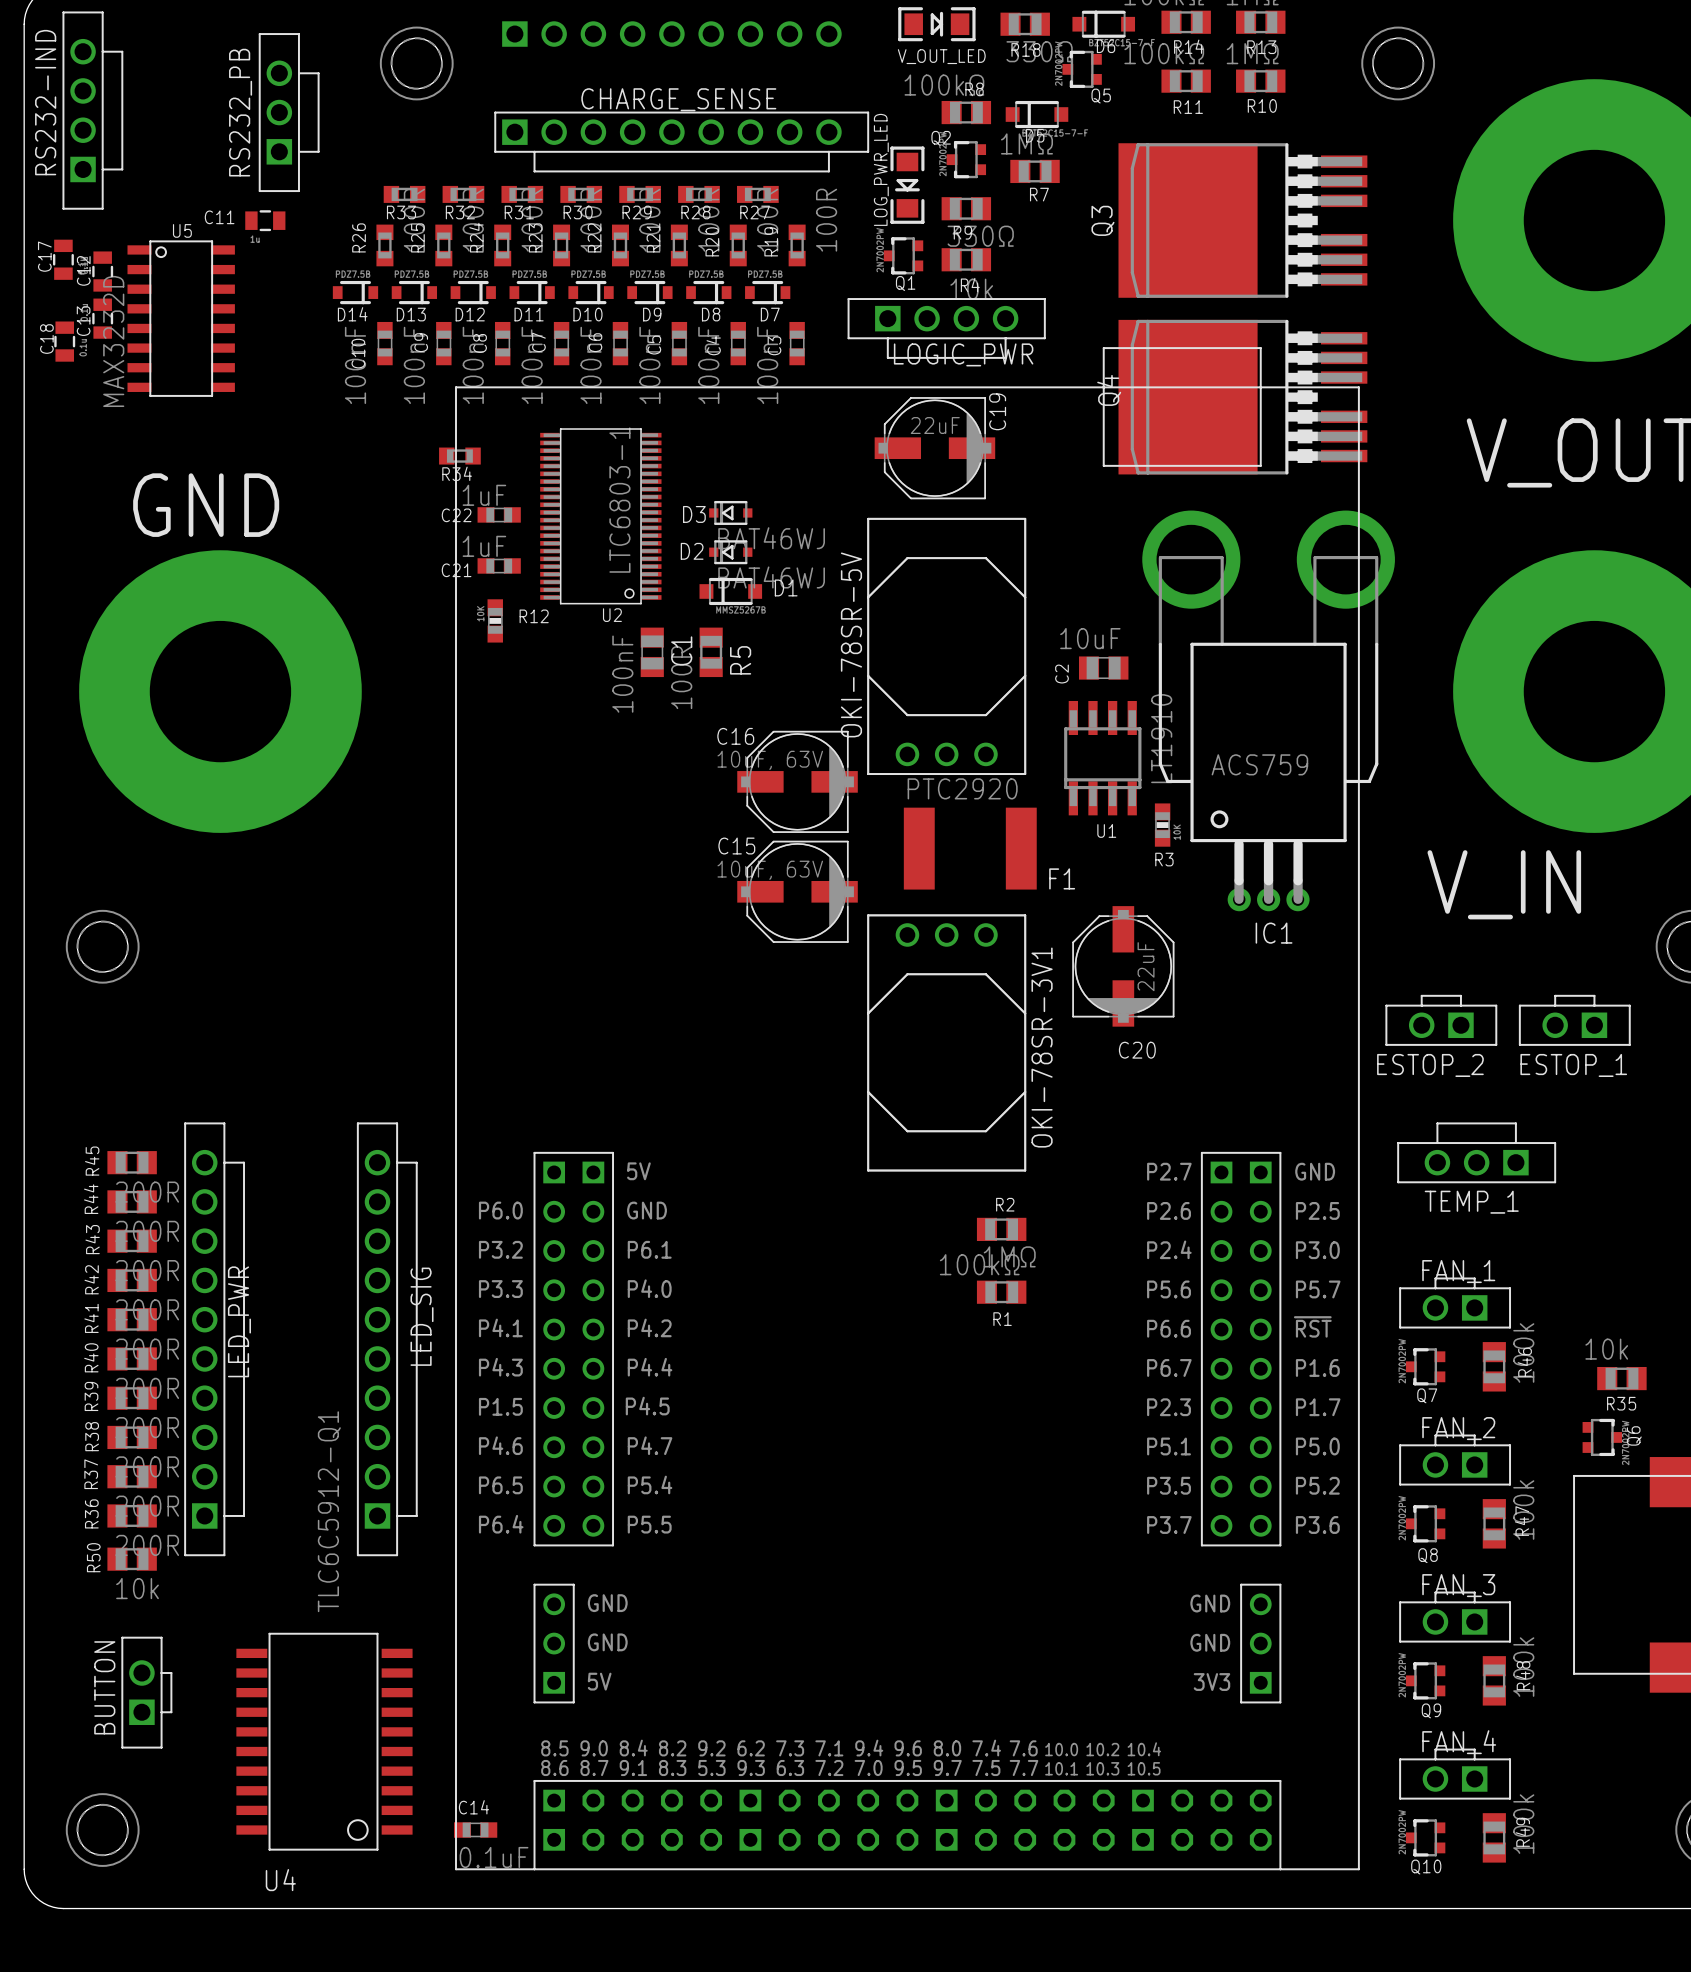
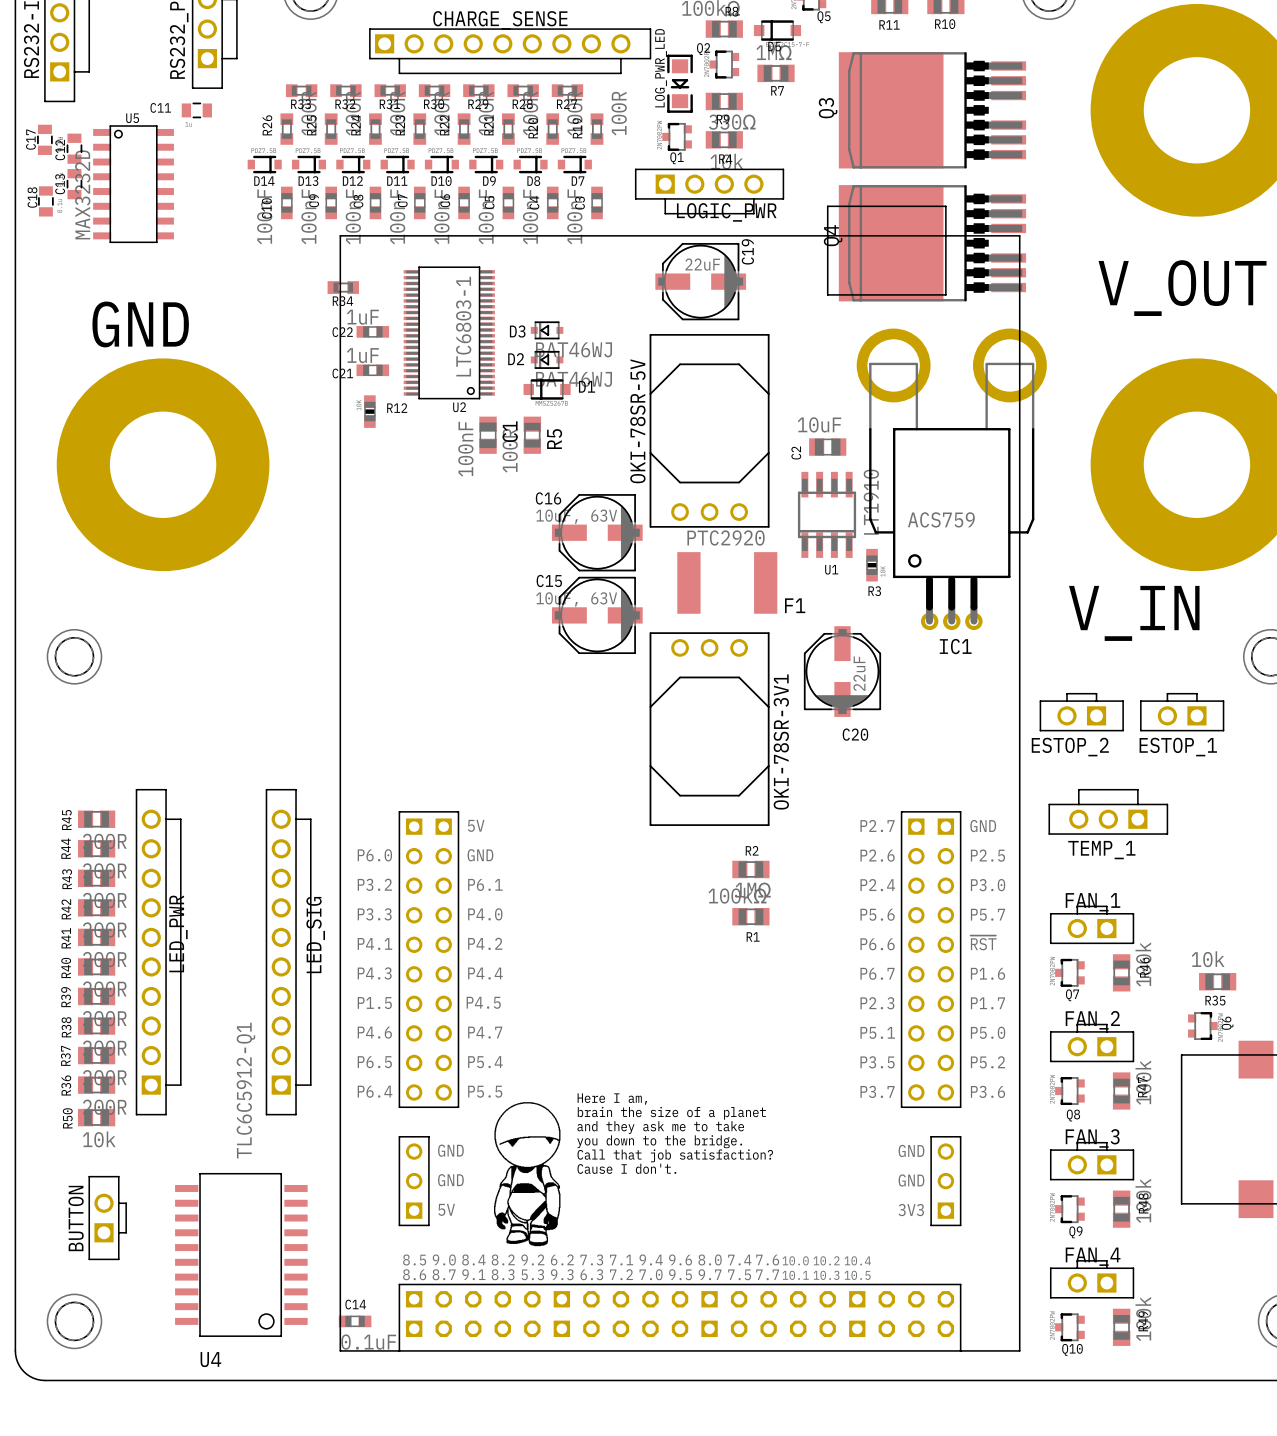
text: none -> Here I am, (612, 1099)
drawing: none -> [494, 1102, 561, 1247]
text: none -> brain the size of a planet (671, 1113)
text: none -> and they ask me to take (660, 1127)
text: none -> you down to the bridge. (659, 1141)
text: none -> Call that job satisfaction? (675, 1155)
text: none -> Cause I don't. (626, 1168)

